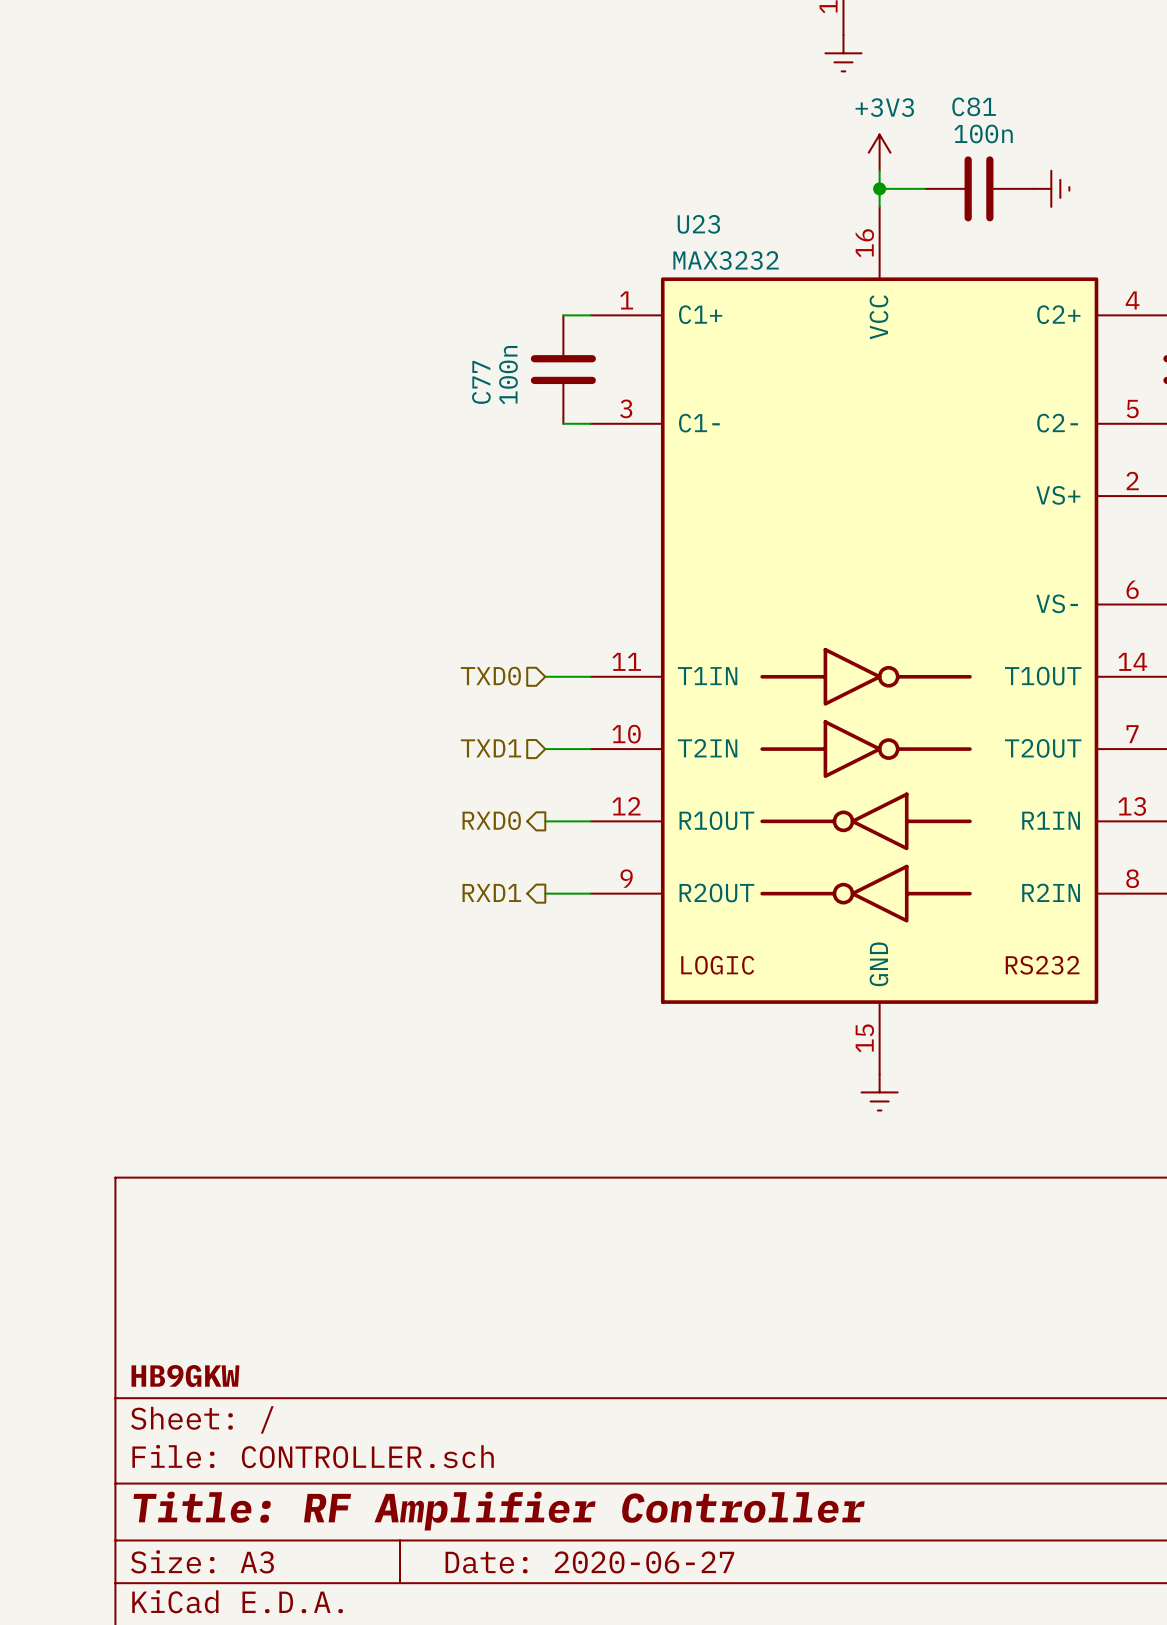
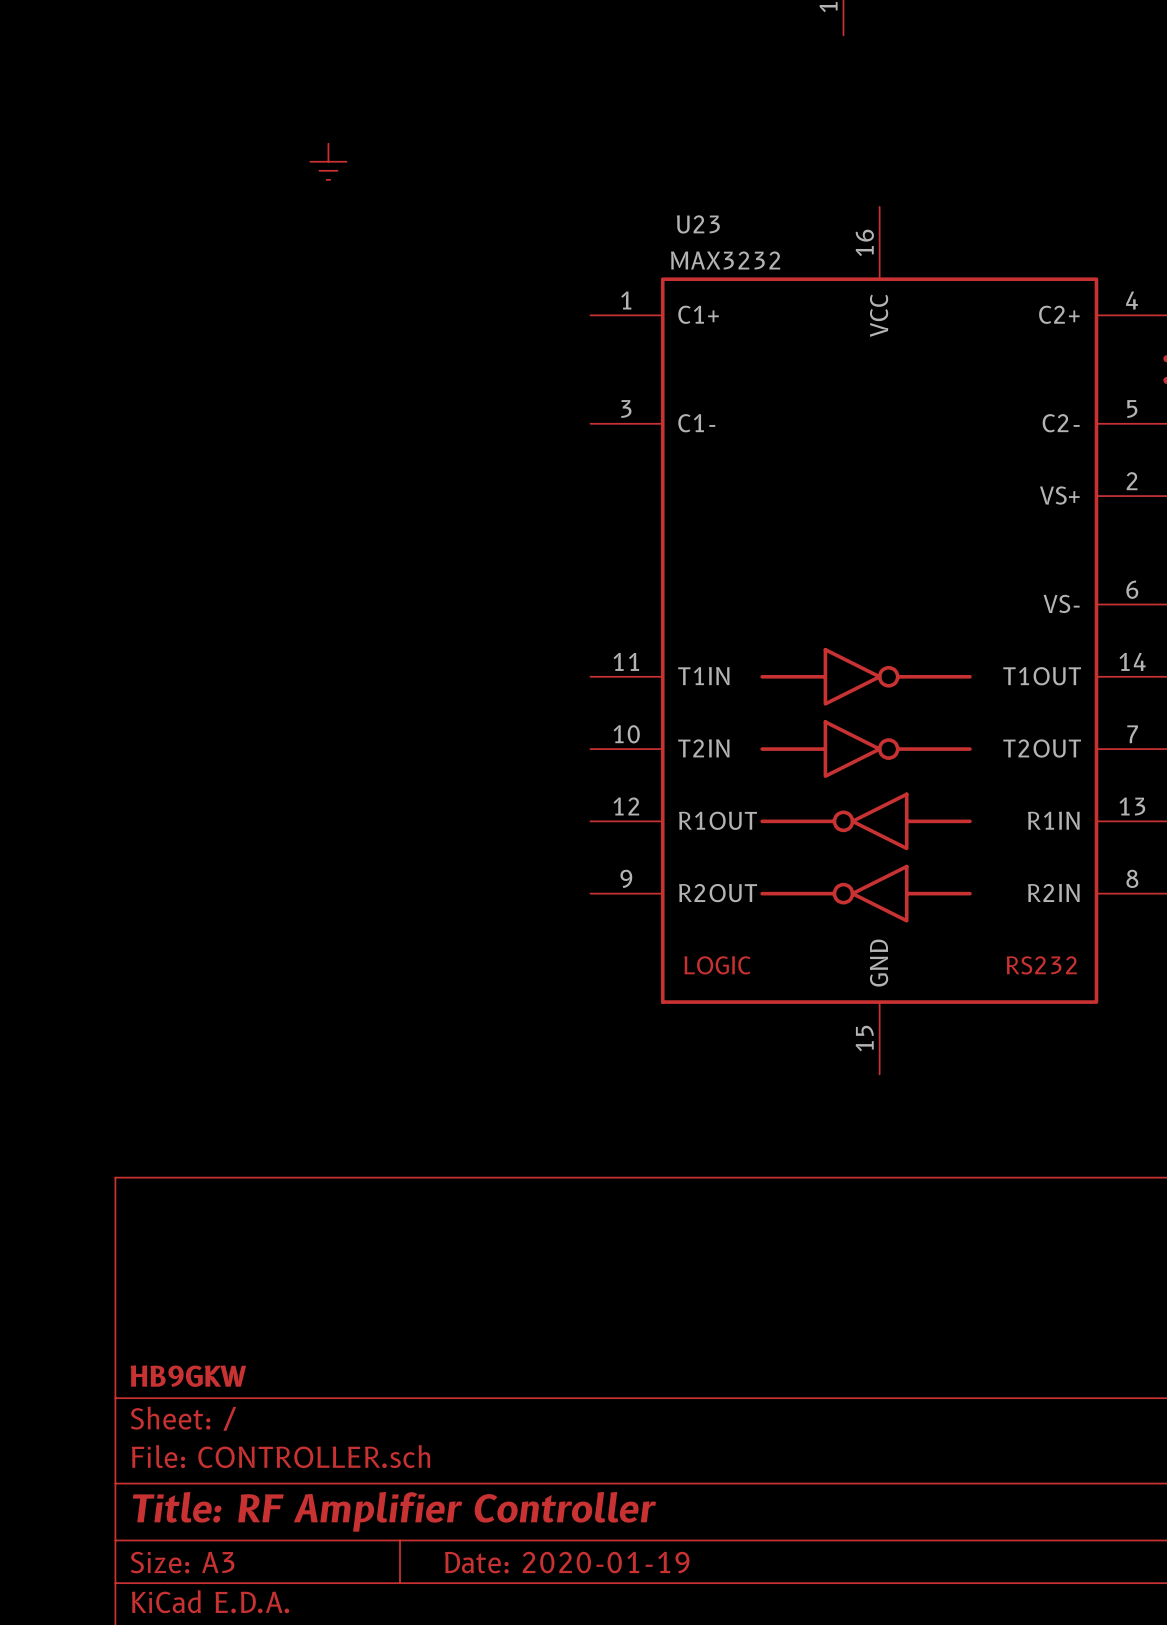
power symbol: (843, 53) -> none
power symbol: +3V3 (879, 152) -> none
power symbol: none -> (328, 161)
wire: (879, 170) (879, 206) -> none
wire: (879, 188) (924, 188) -> none
junction: (879, 188) -> none
C81: 100n (979, 188) -> none
power symbol: (1051, 188) -> none
wire: (563, 315) (590, 315) -> none
C77: 100n (563, 369) -> none
wire: (563, 423) (590, 423) -> none
hierarchical label: TXD0 (490, 676) -> none
wire: (545, 676) (590, 676) -> none
hierarchical label: TXD1 (490, 748) -> none
wire: (545, 749) (590, 749) -> none
hierarchical label: RXD0 (491, 820) -> none
wire: (545, 821) (590, 821) -> none
hierarchical label: RXD1 (491, 892) -> none
wire: (545, 893) (590, 893) -> none
power symbol: (879, 1092) -> none
title block: Date: 2020-06-27 (589, 1562) -> Date: 2020-01-19 (567, 1562)

